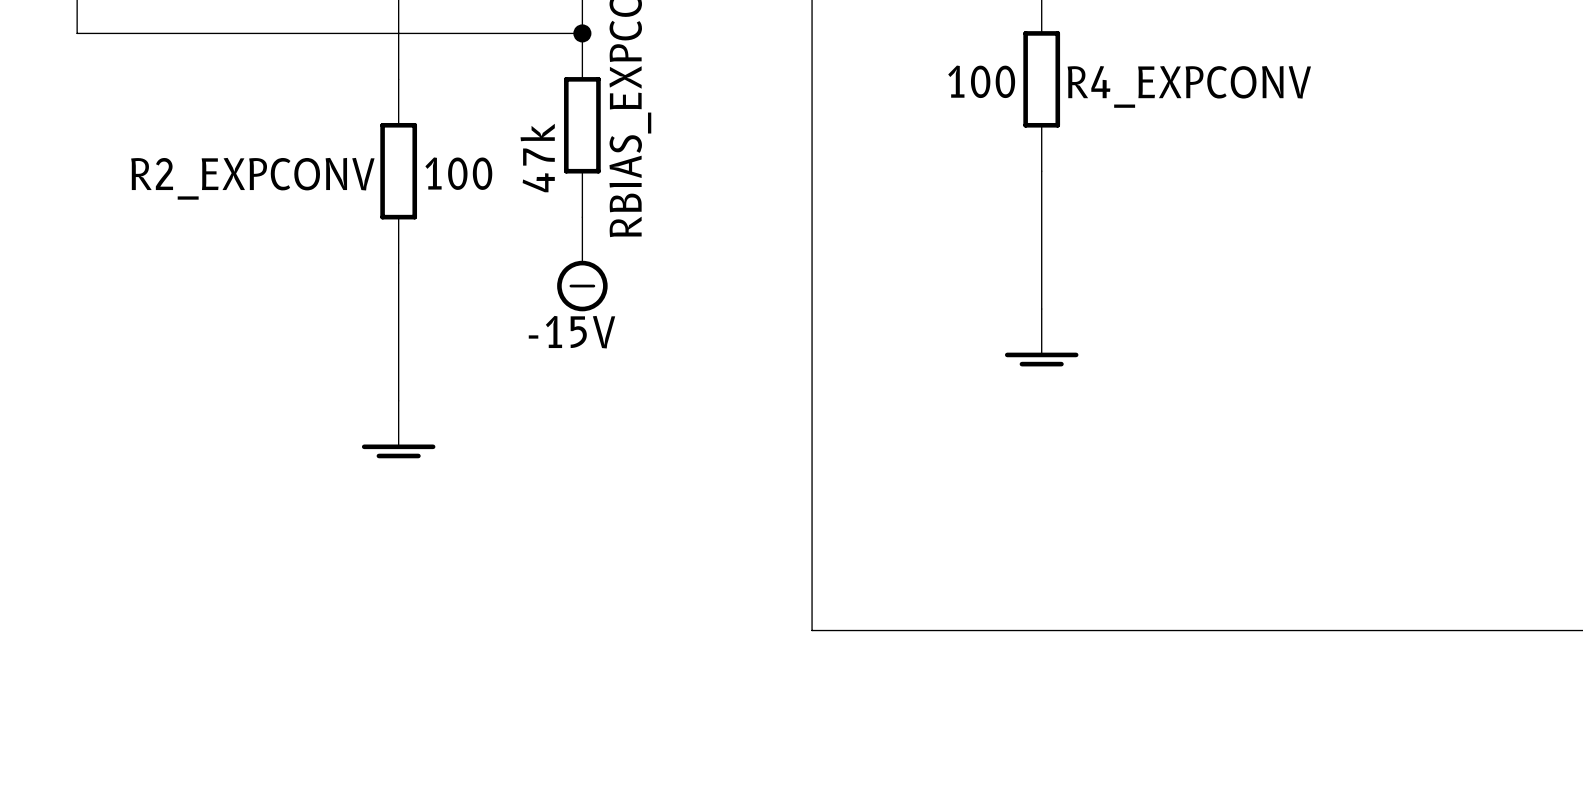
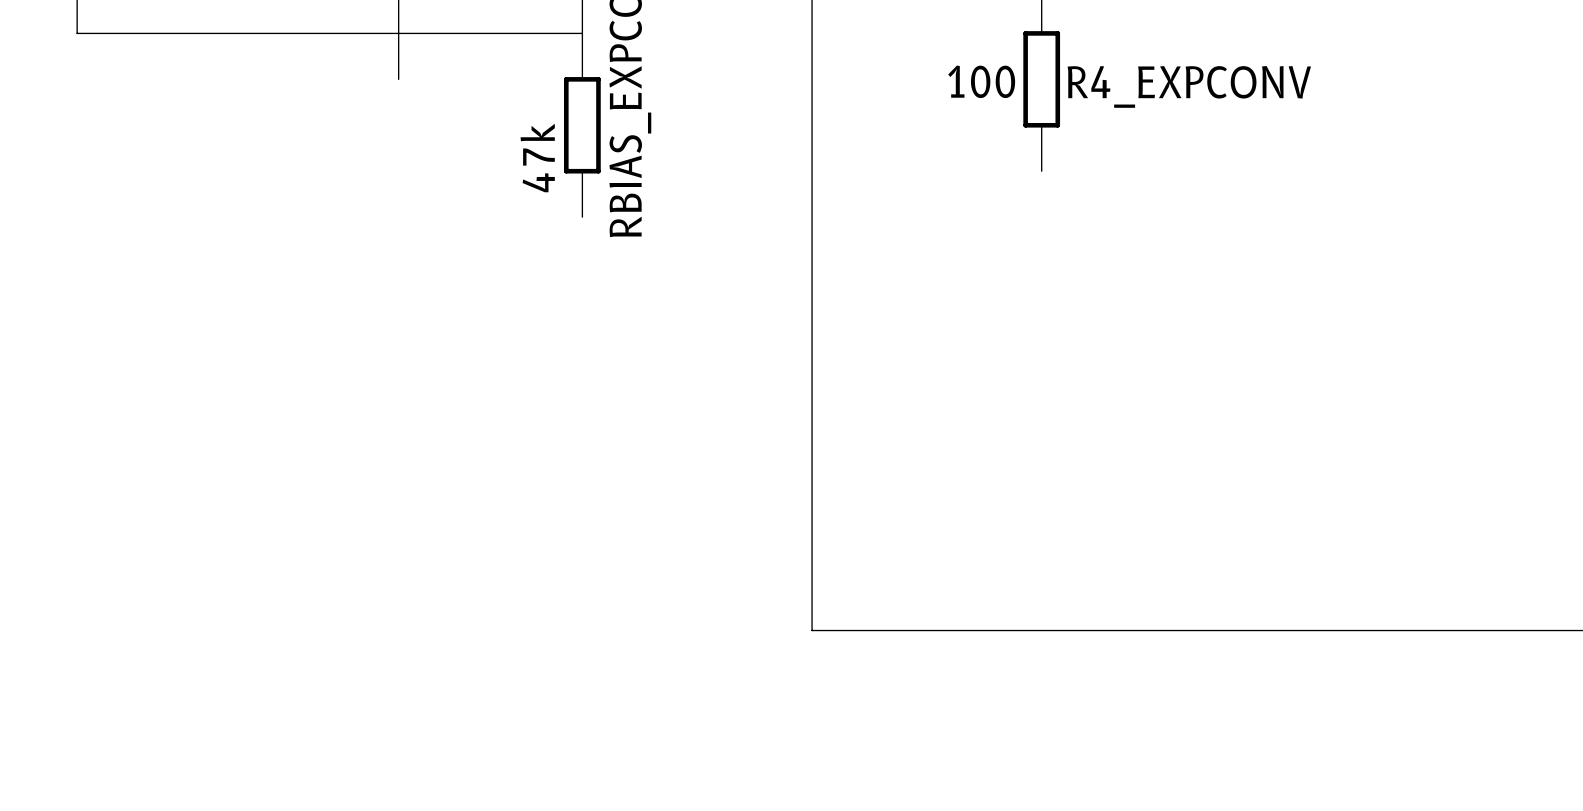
junction: (582, 33) -> none
R2_EXPCONV: 100 (398, 171) -> none
wire: (1041, 171) (1041, 309) -> none
wire: (398, 263) (398, 400) -> none
power symbol: -15V (582, 264) -> none
power symbol: (1041, 337) -> none
power symbol: (398, 429) -> none

